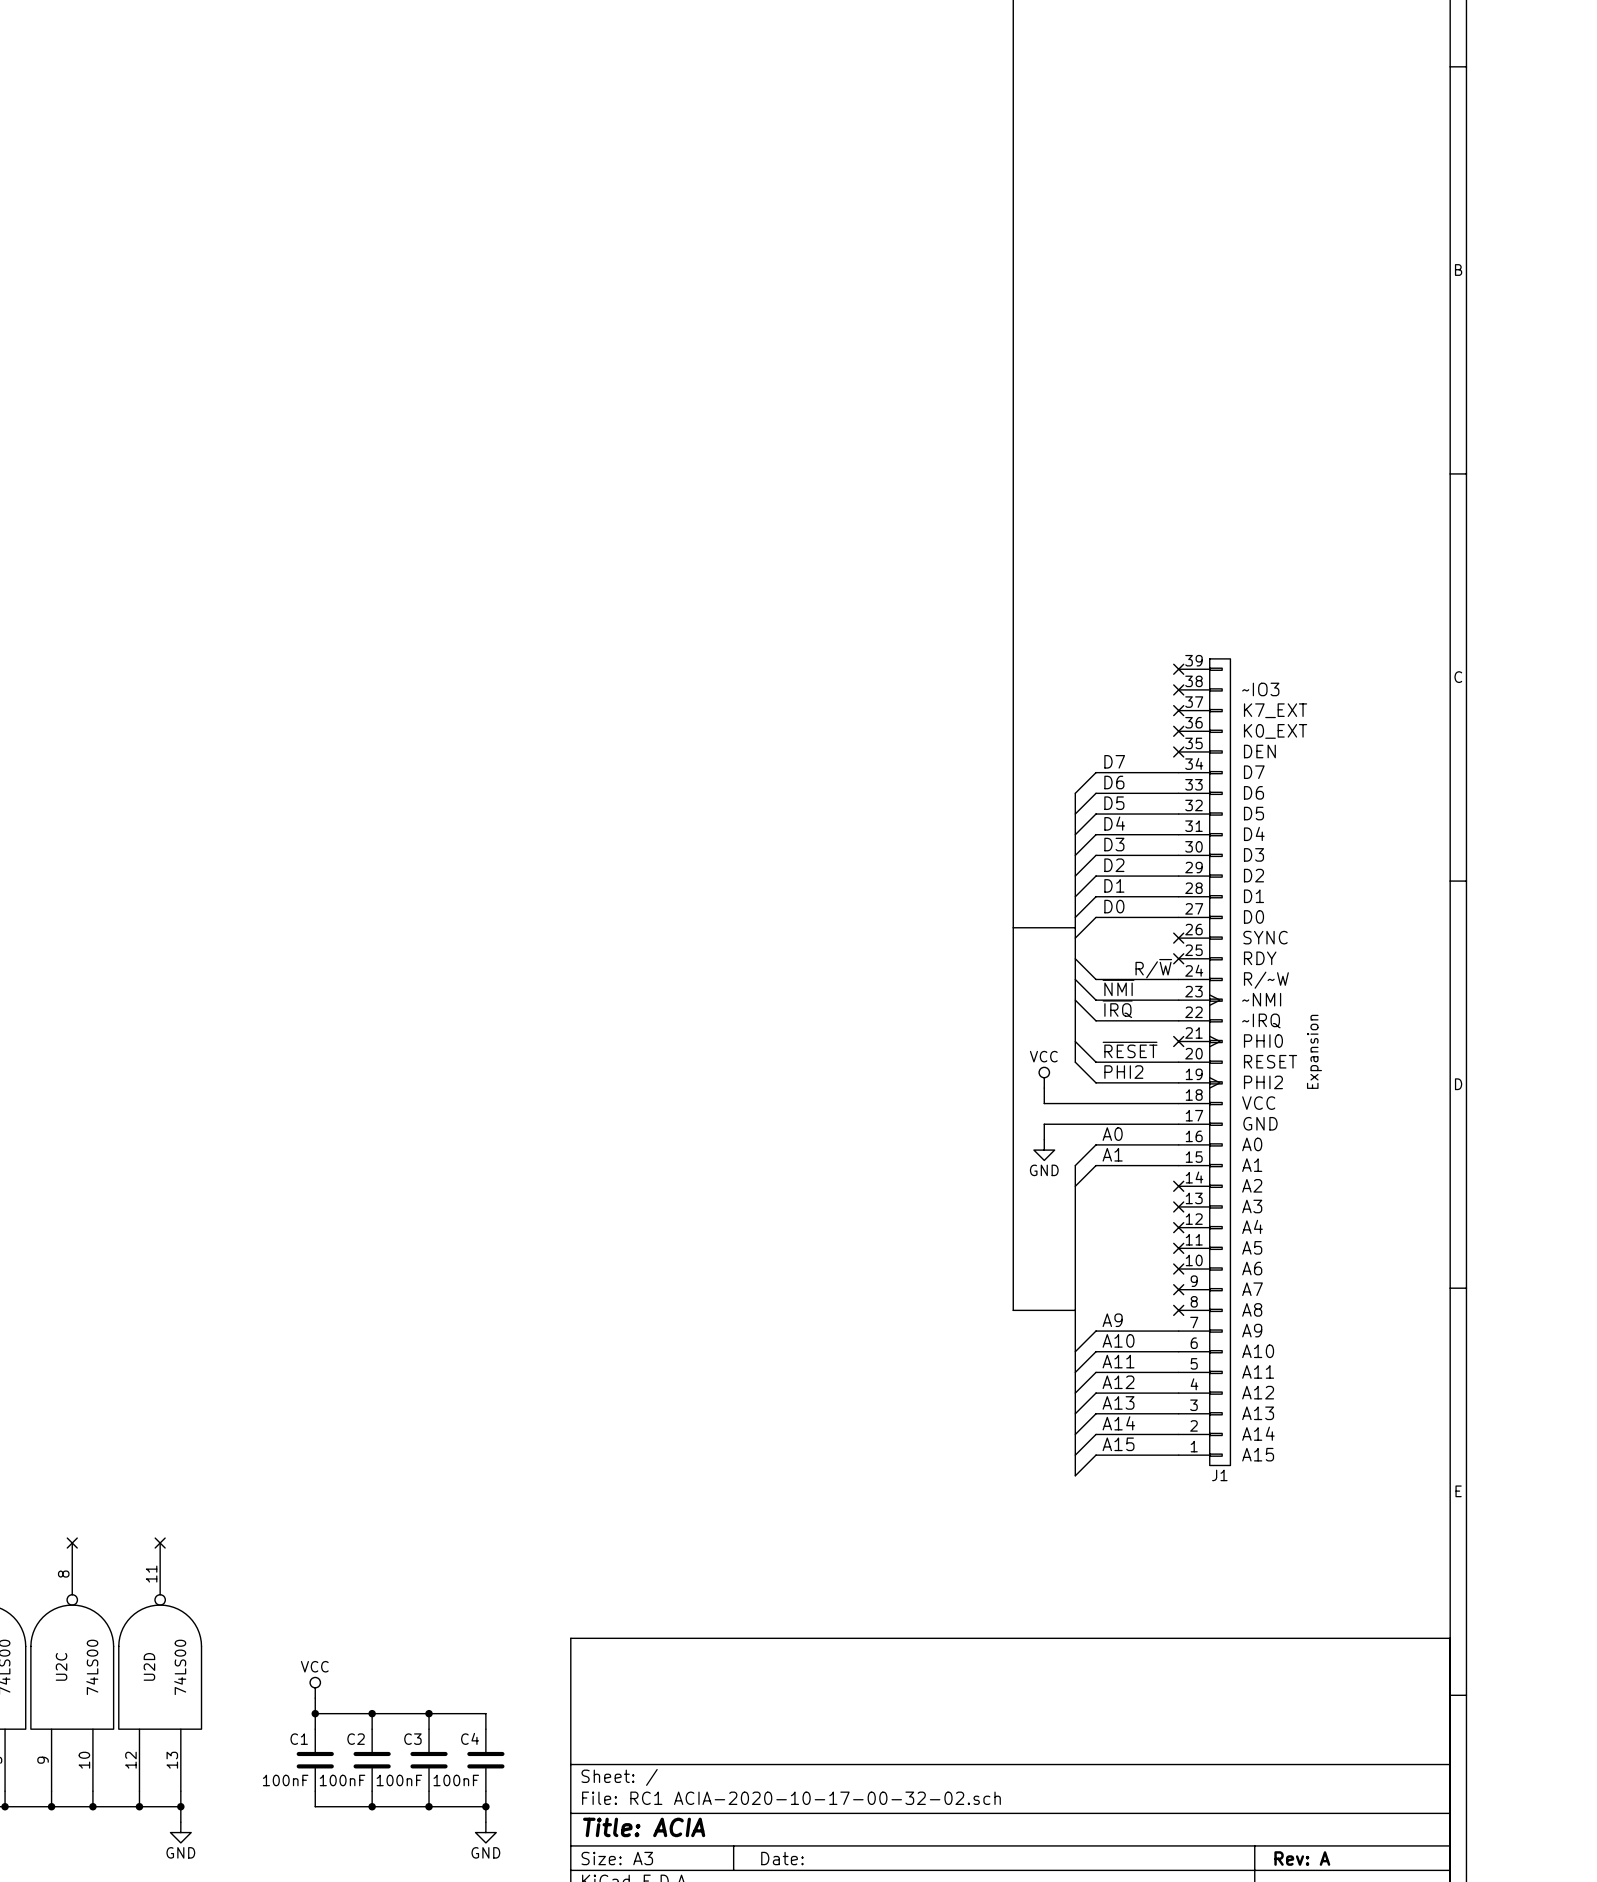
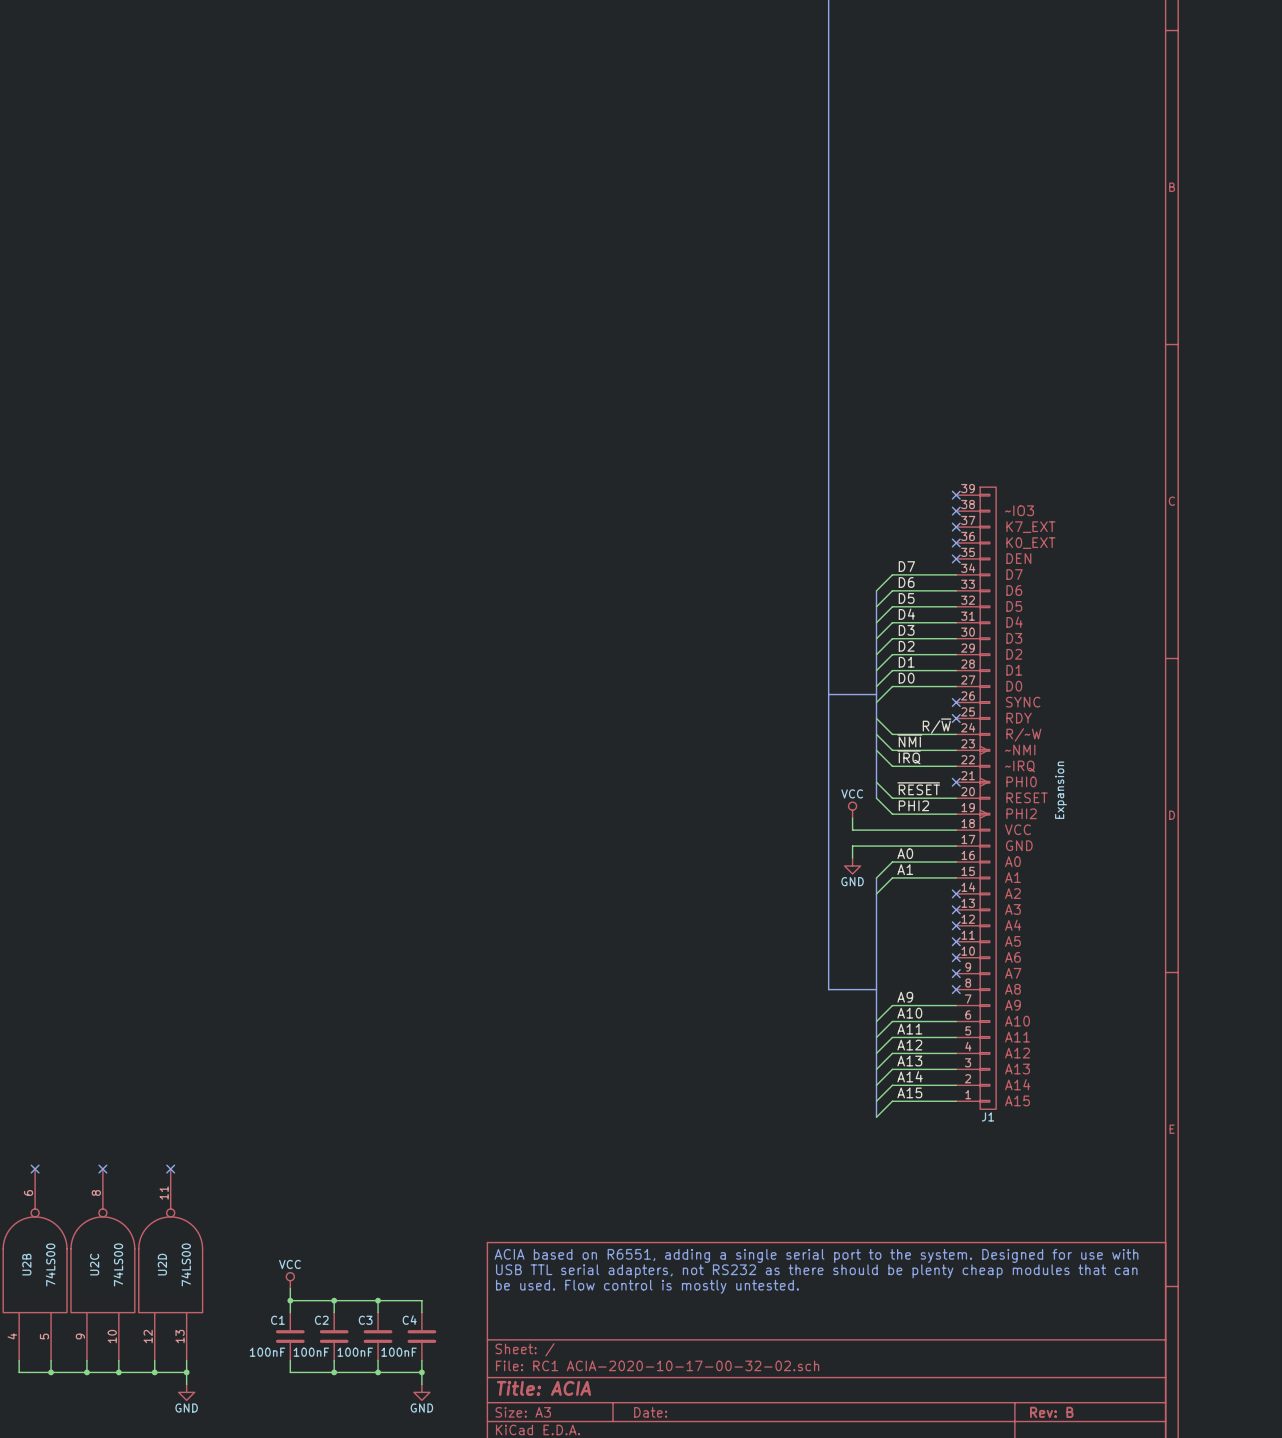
text: none -> ACIA based on R6551, adding a single serial port to the system. Designed for use with (816, 1255)
text: none -> USB TTL serial adapters, not RS232 as there should be plenty cheap modules that can (816, 1271)
text: none -> be used. Flow control is mostly untested. (647, 1286)
title block: Rev: A (1302, 1858) -> Rev: B (1051, 1412)

